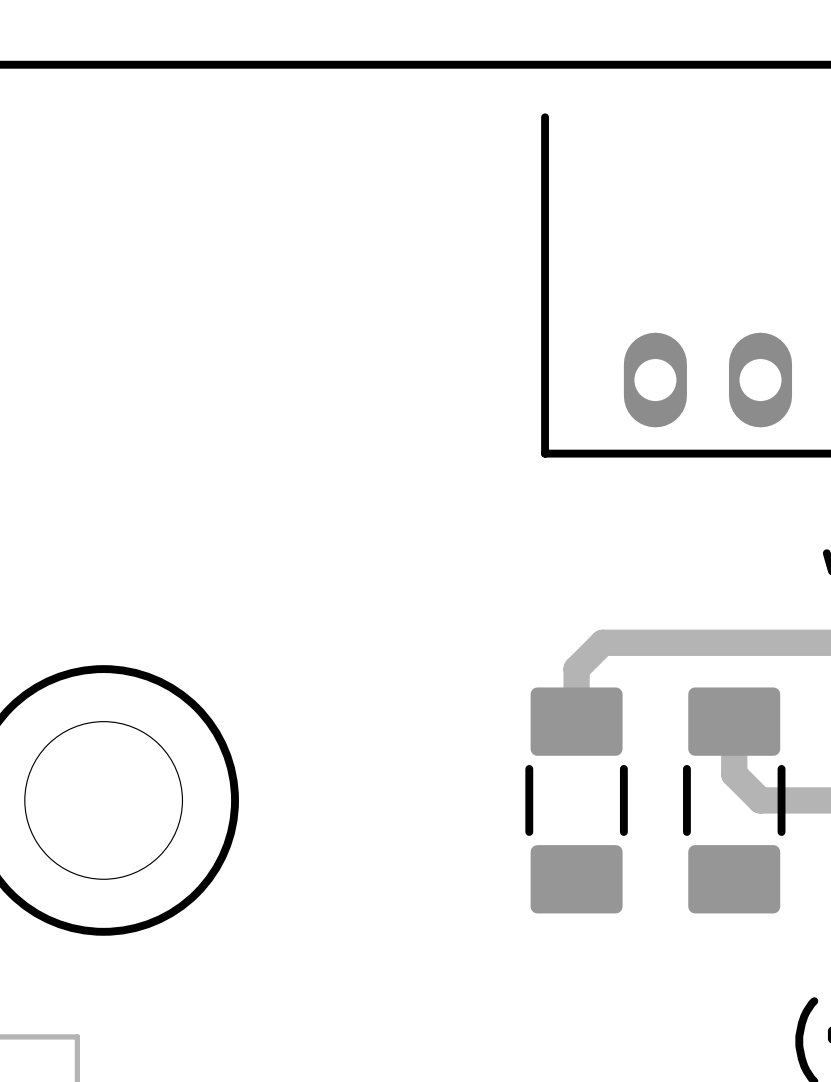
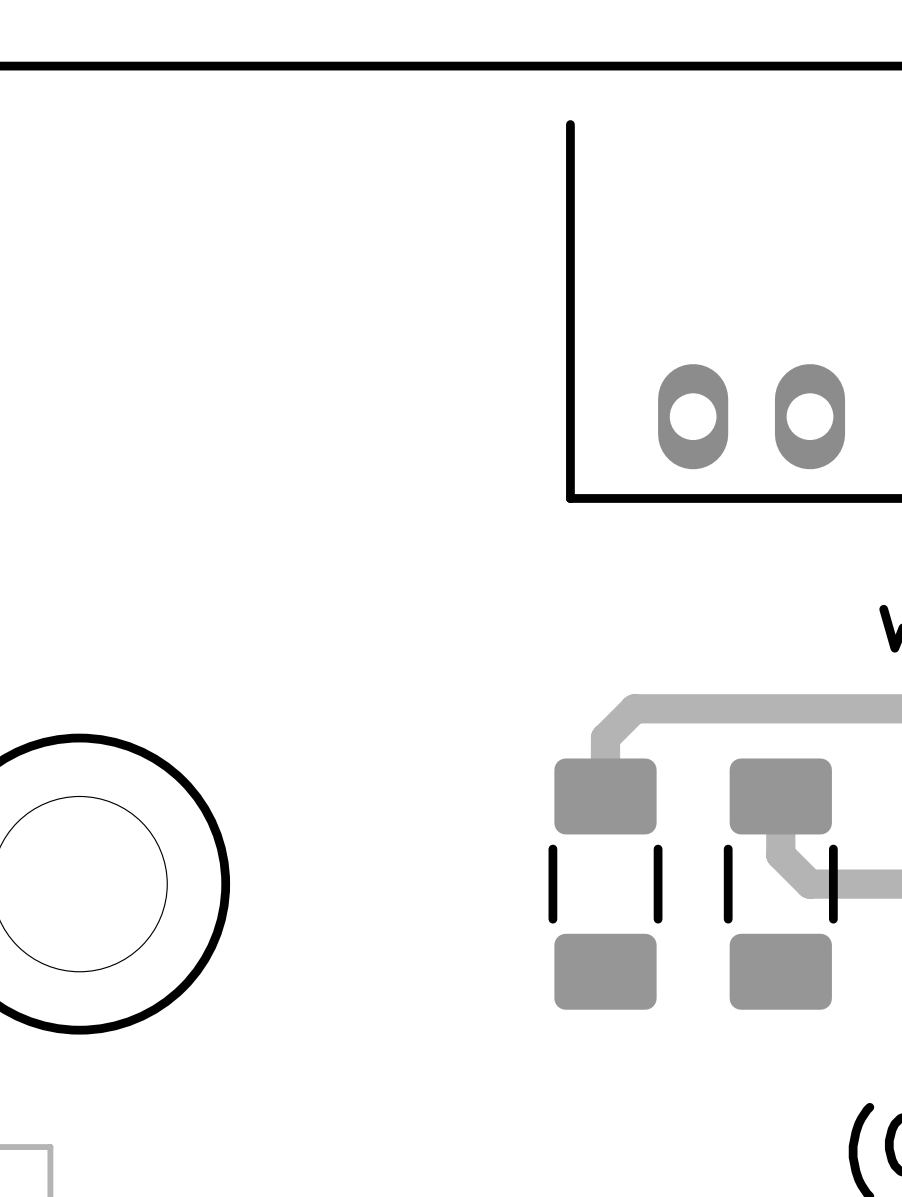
part footprint: [525, 687, 628, 914] -> [548, 758, 663, 1010]
part footprint: [683, 687, 786, 914] -> [723, 758, 838, 1010]

